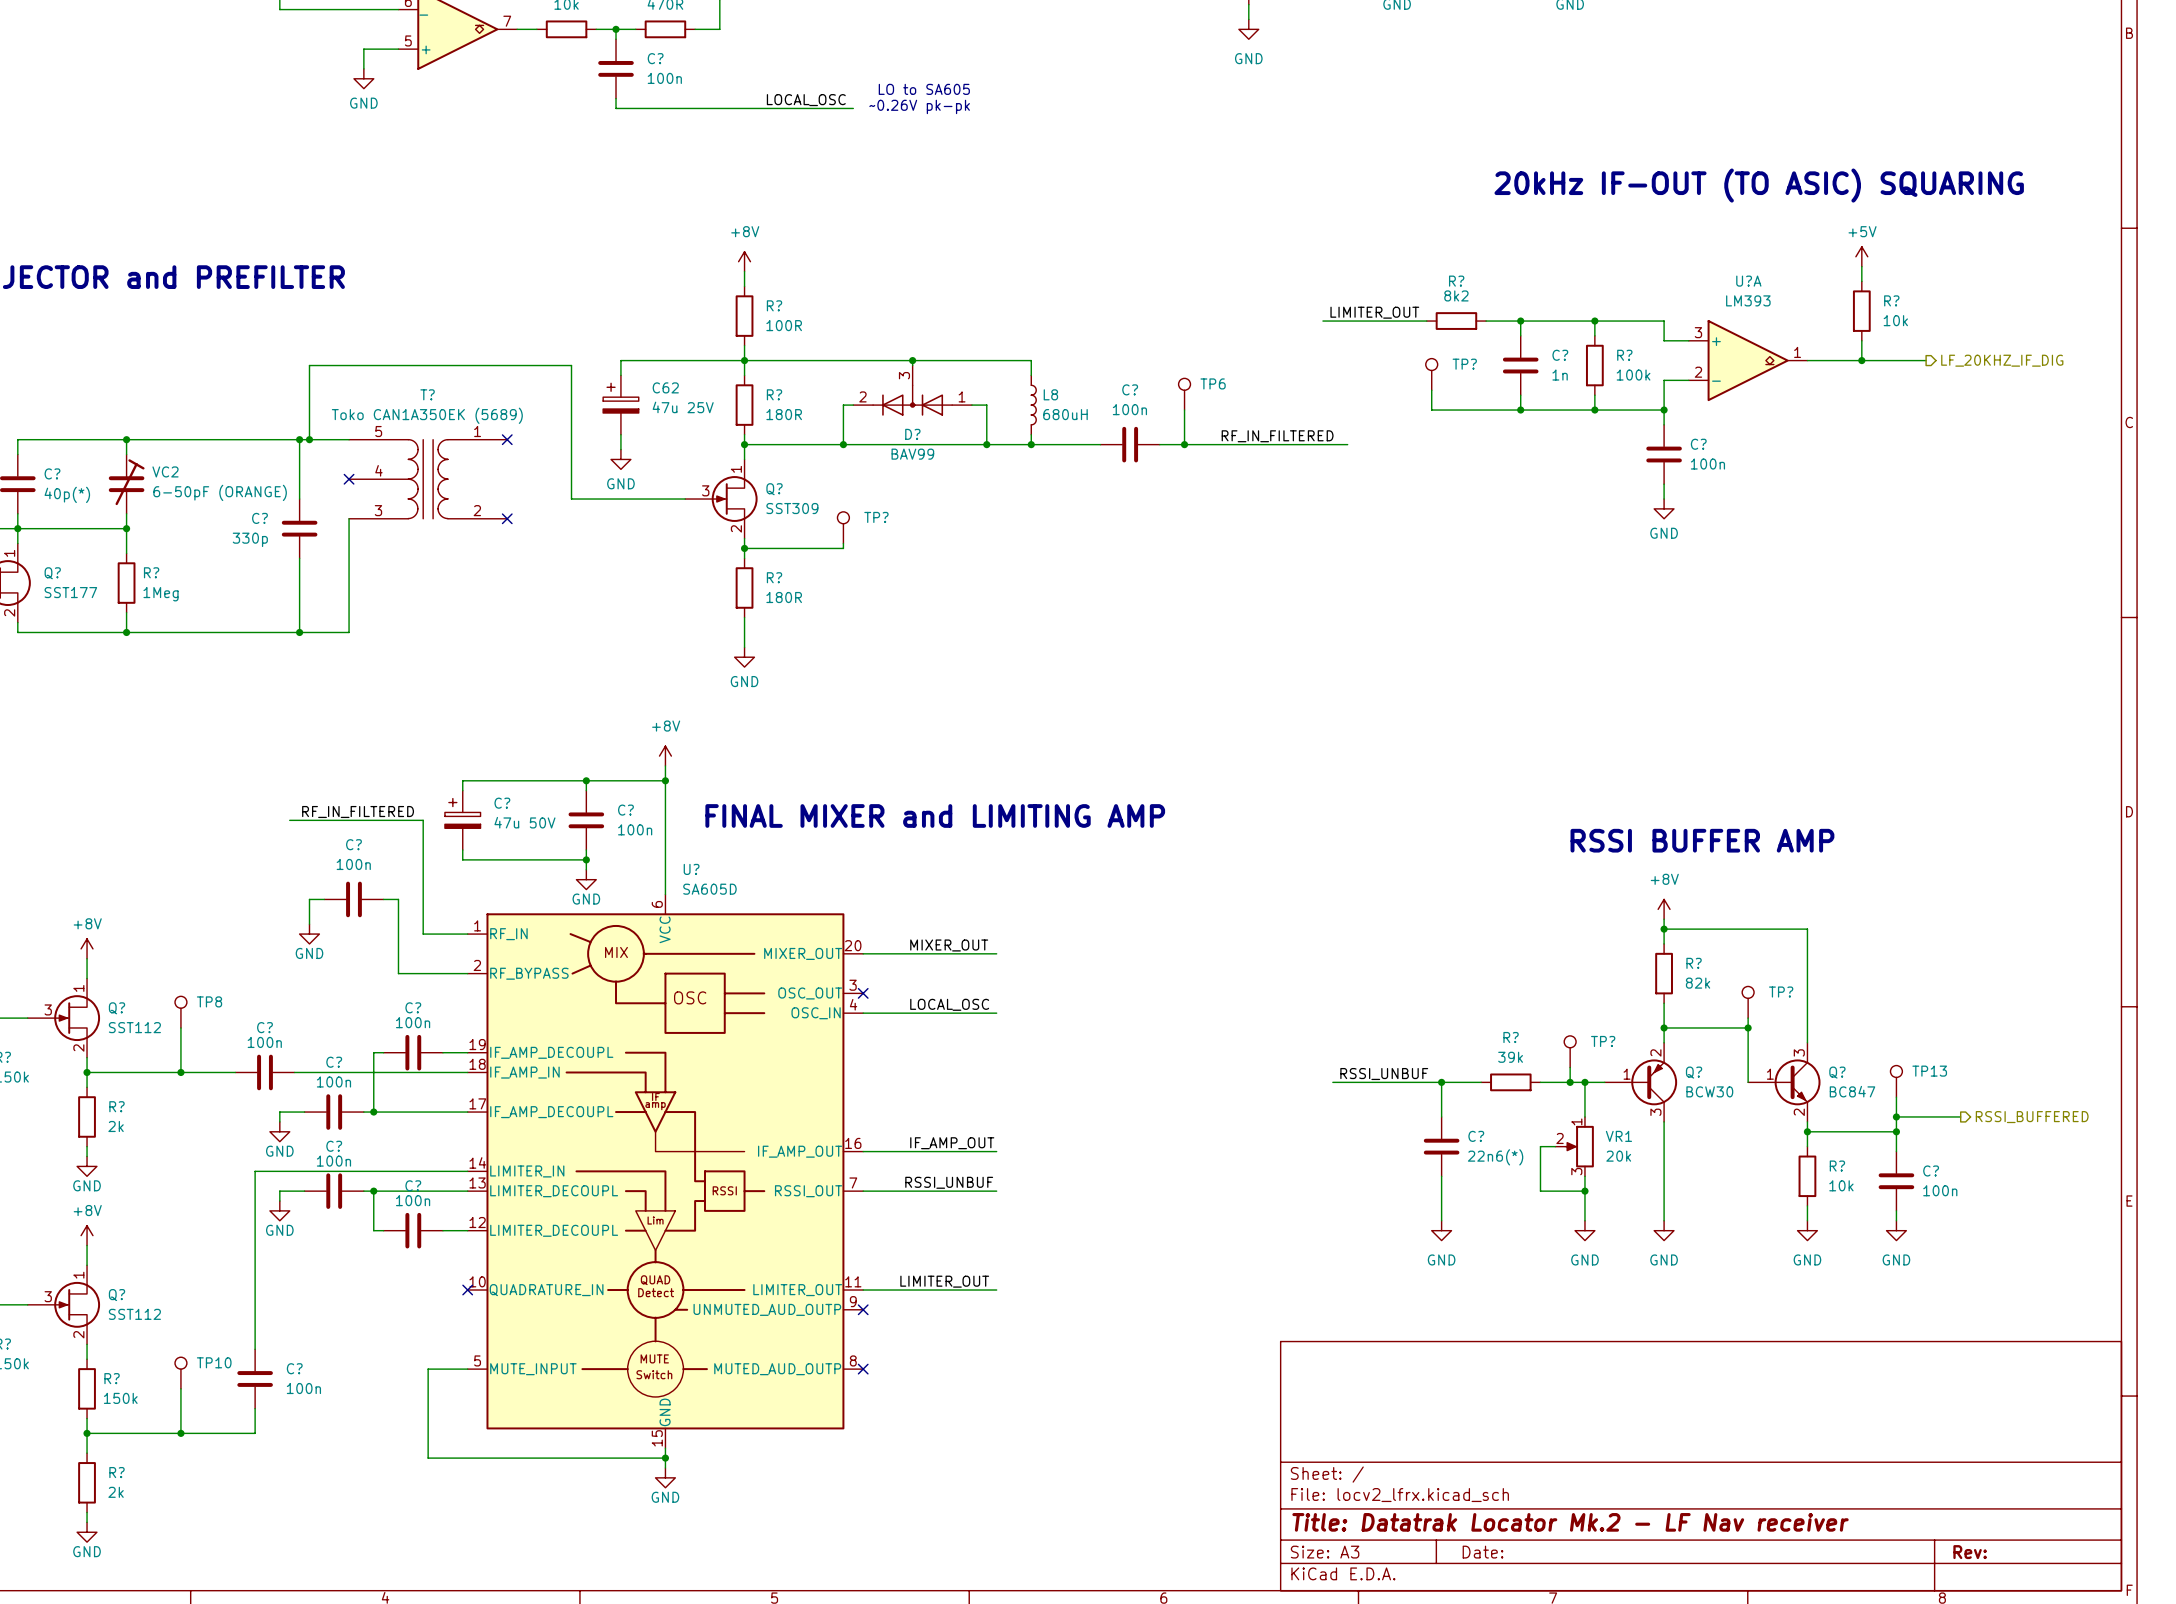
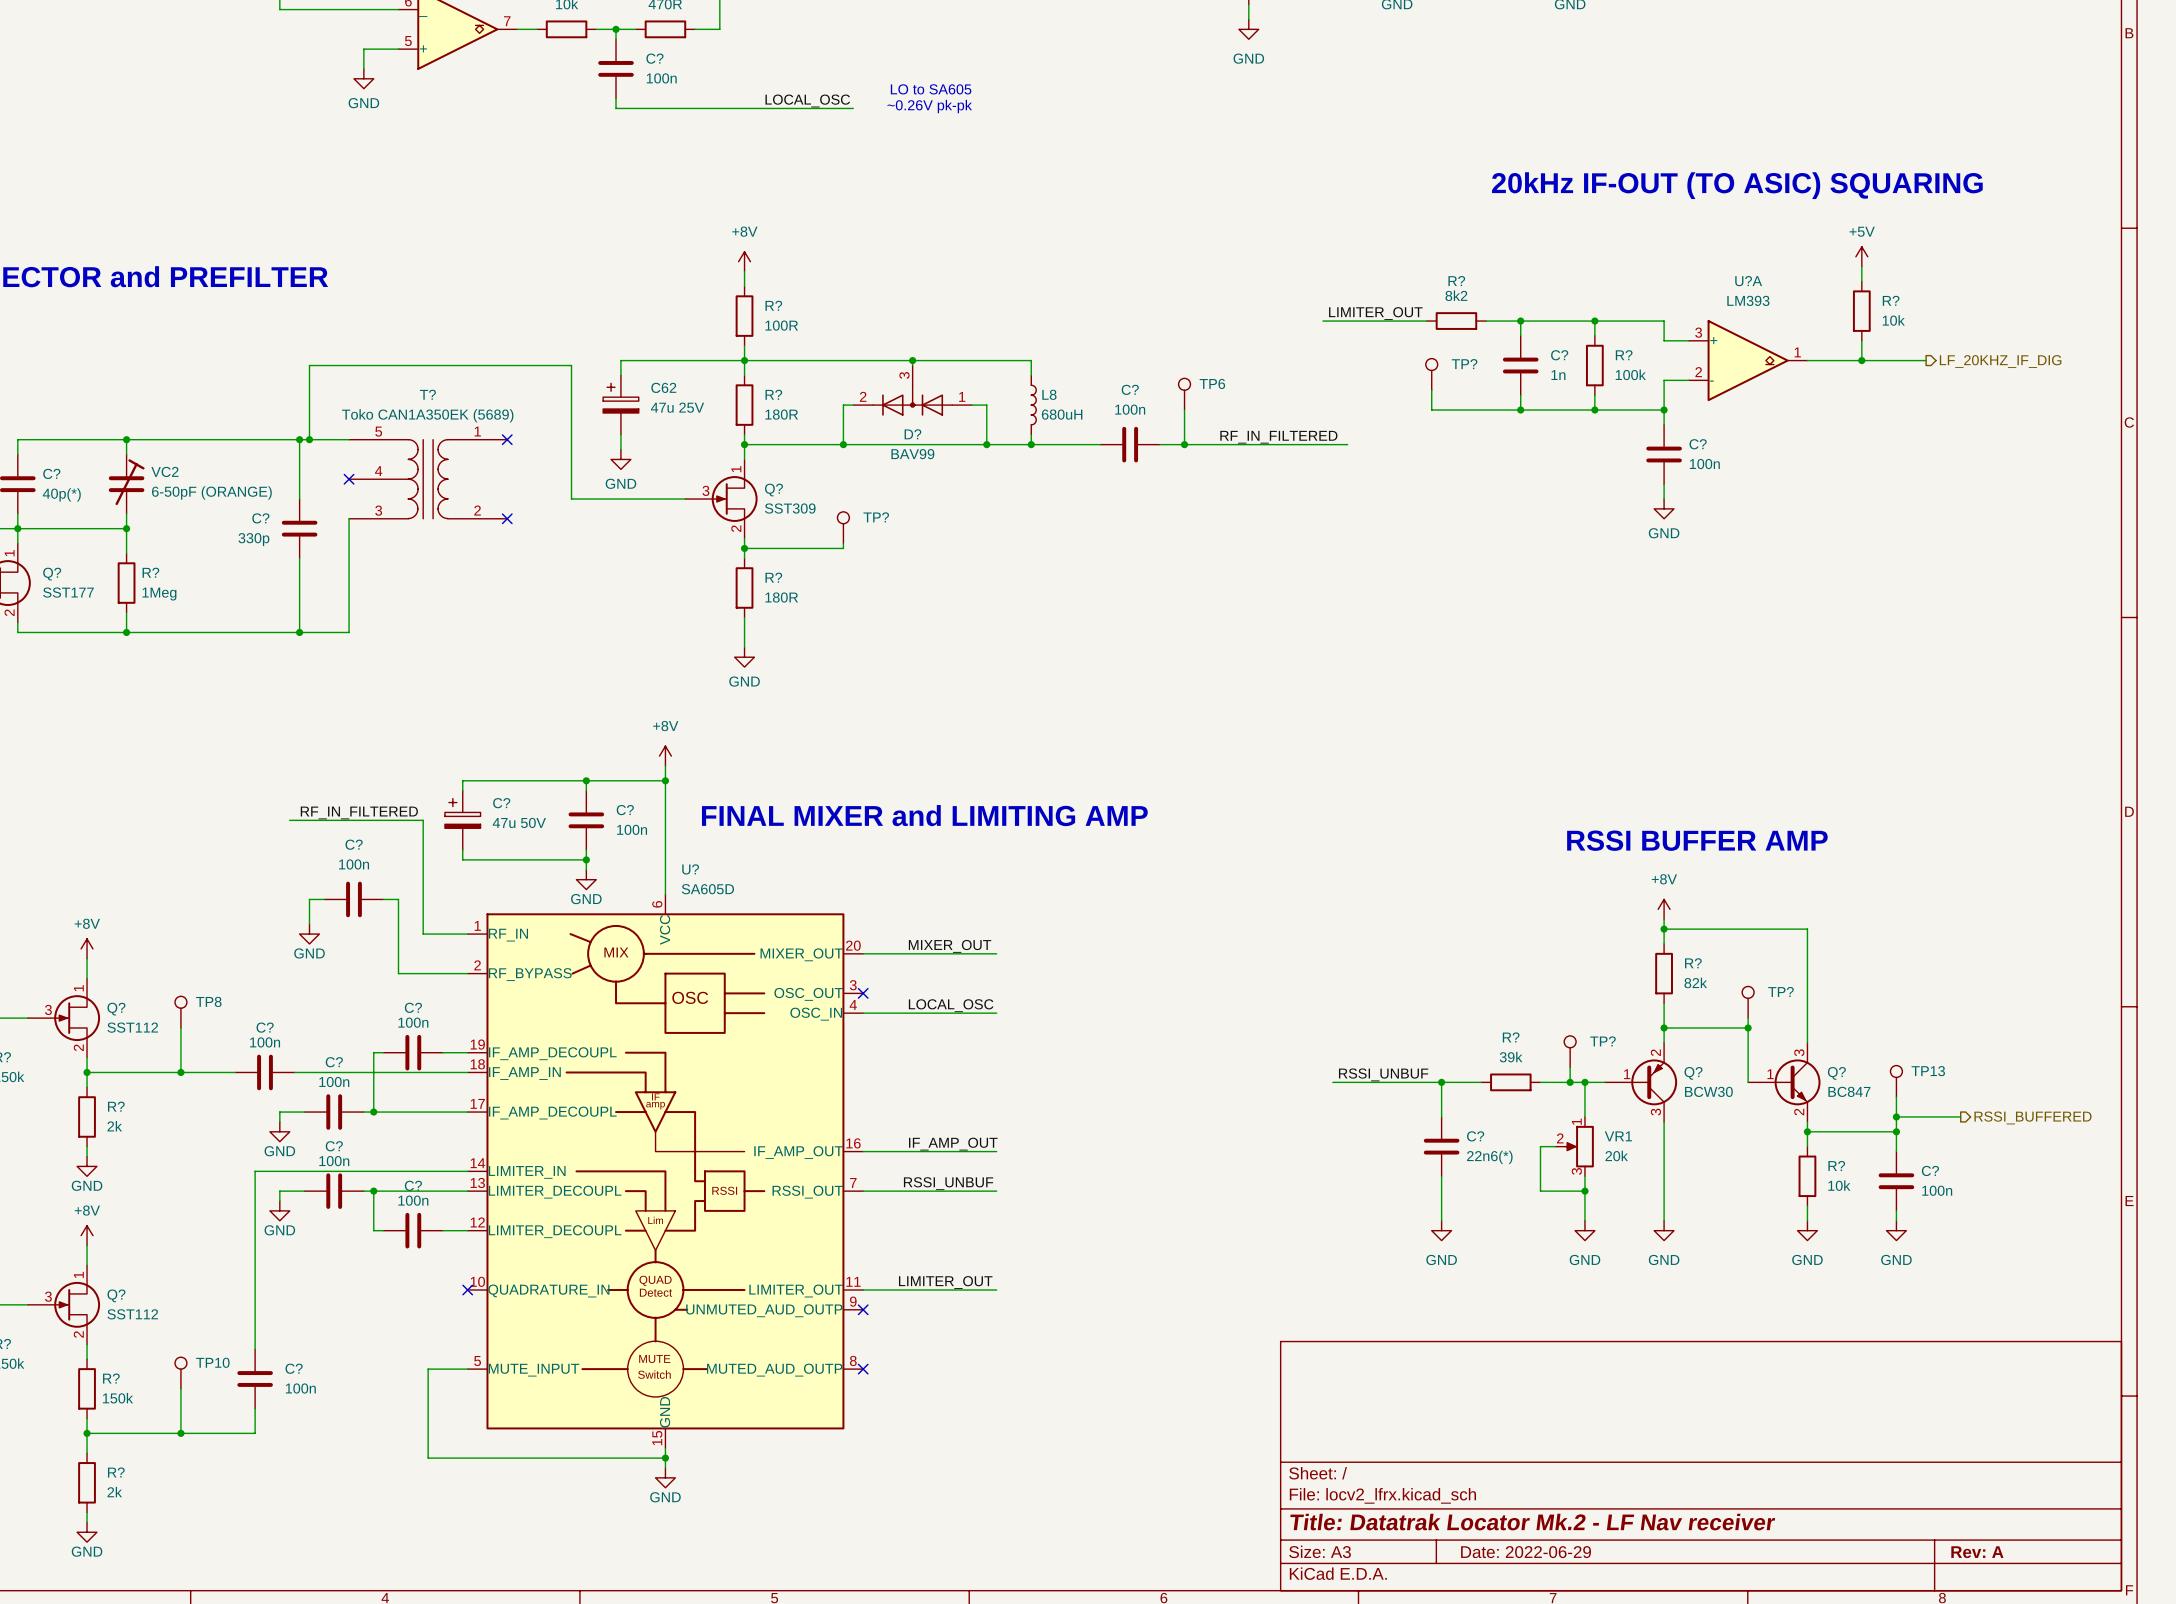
title block: Date: (1483, 1552) -> Date: 2022-06-29 (1526, 1552)
title block: Rev: (1970, 1552) -> Rev: A (1977, 1552)

